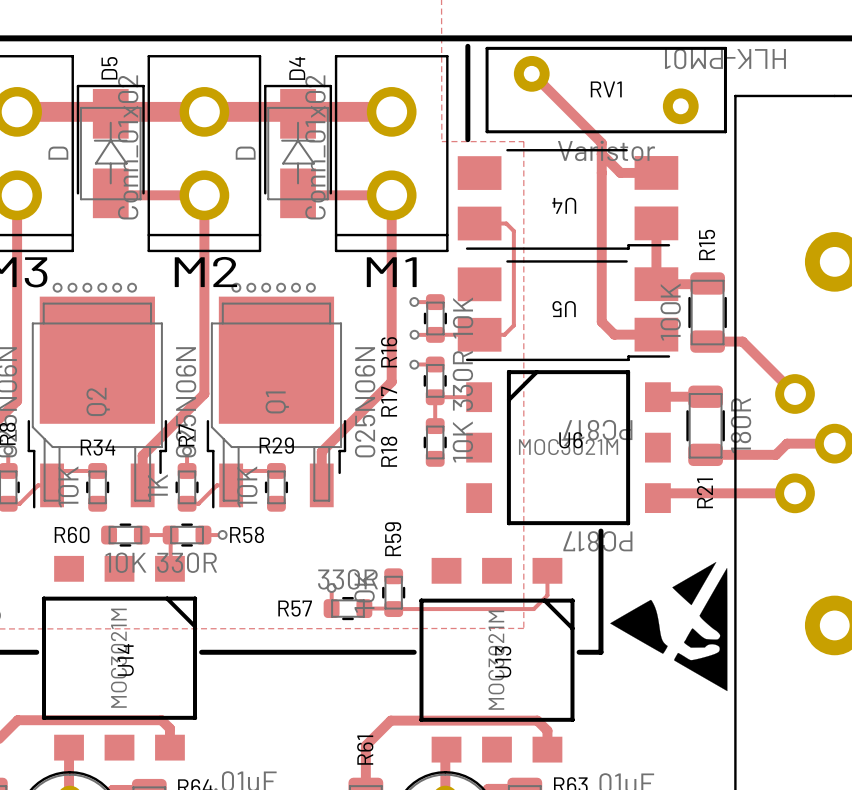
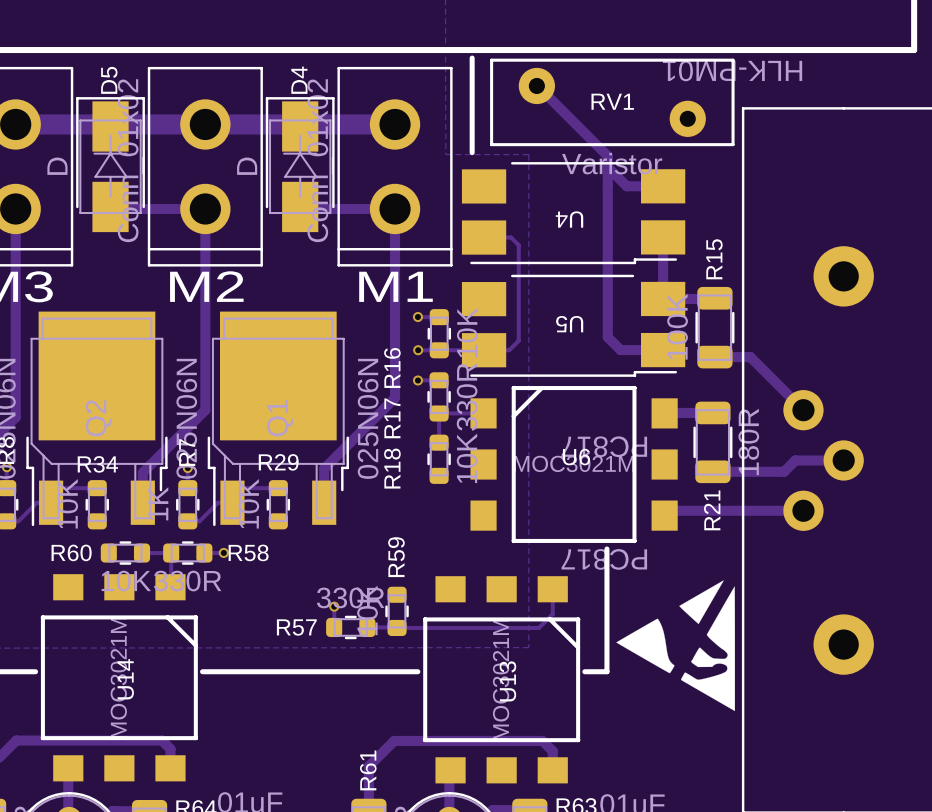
via: (57, 287) -> none
via: (72, 287) -> none
via: (87, 287) -> none
via: (102, 287) -> none
via: (117, 287) -> none
via: (132, 287) -> none
via: (236, 287) -> none
via: (251, 287) -> none
via: (266, 287) -> none
via: (281, 287) -> none
via: (295, 287) -> none
via: (310, 287) -> none

